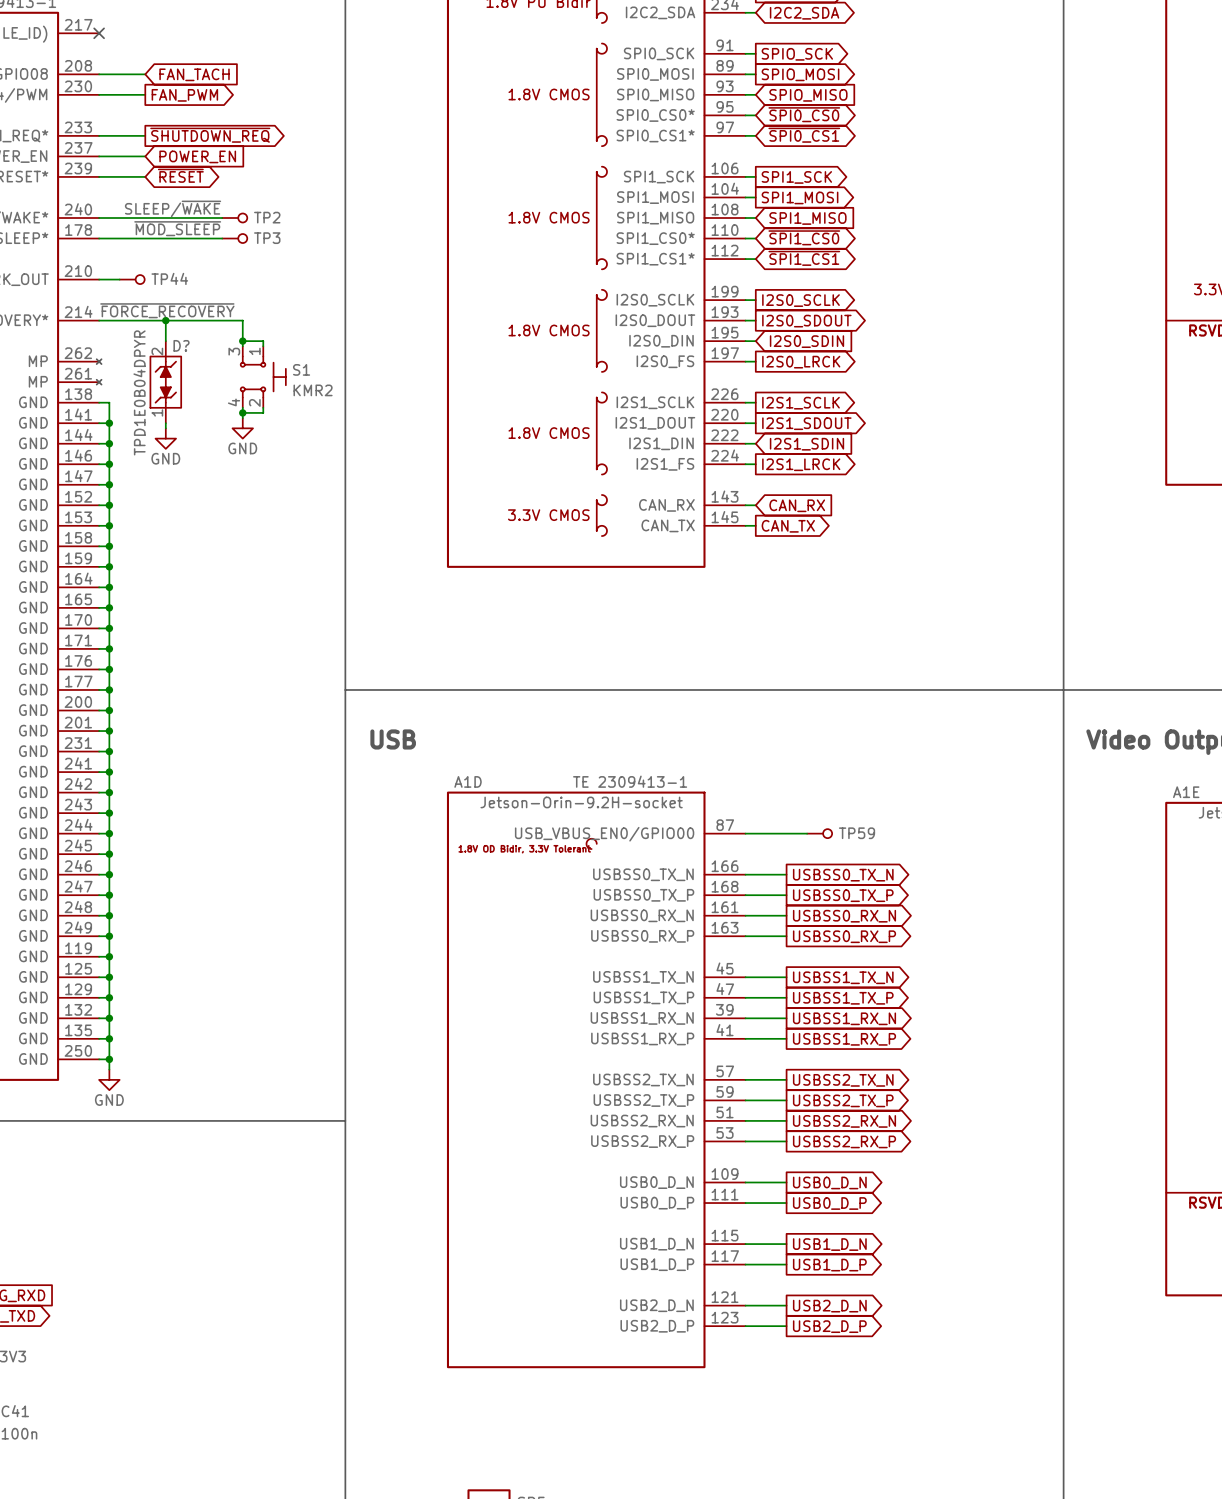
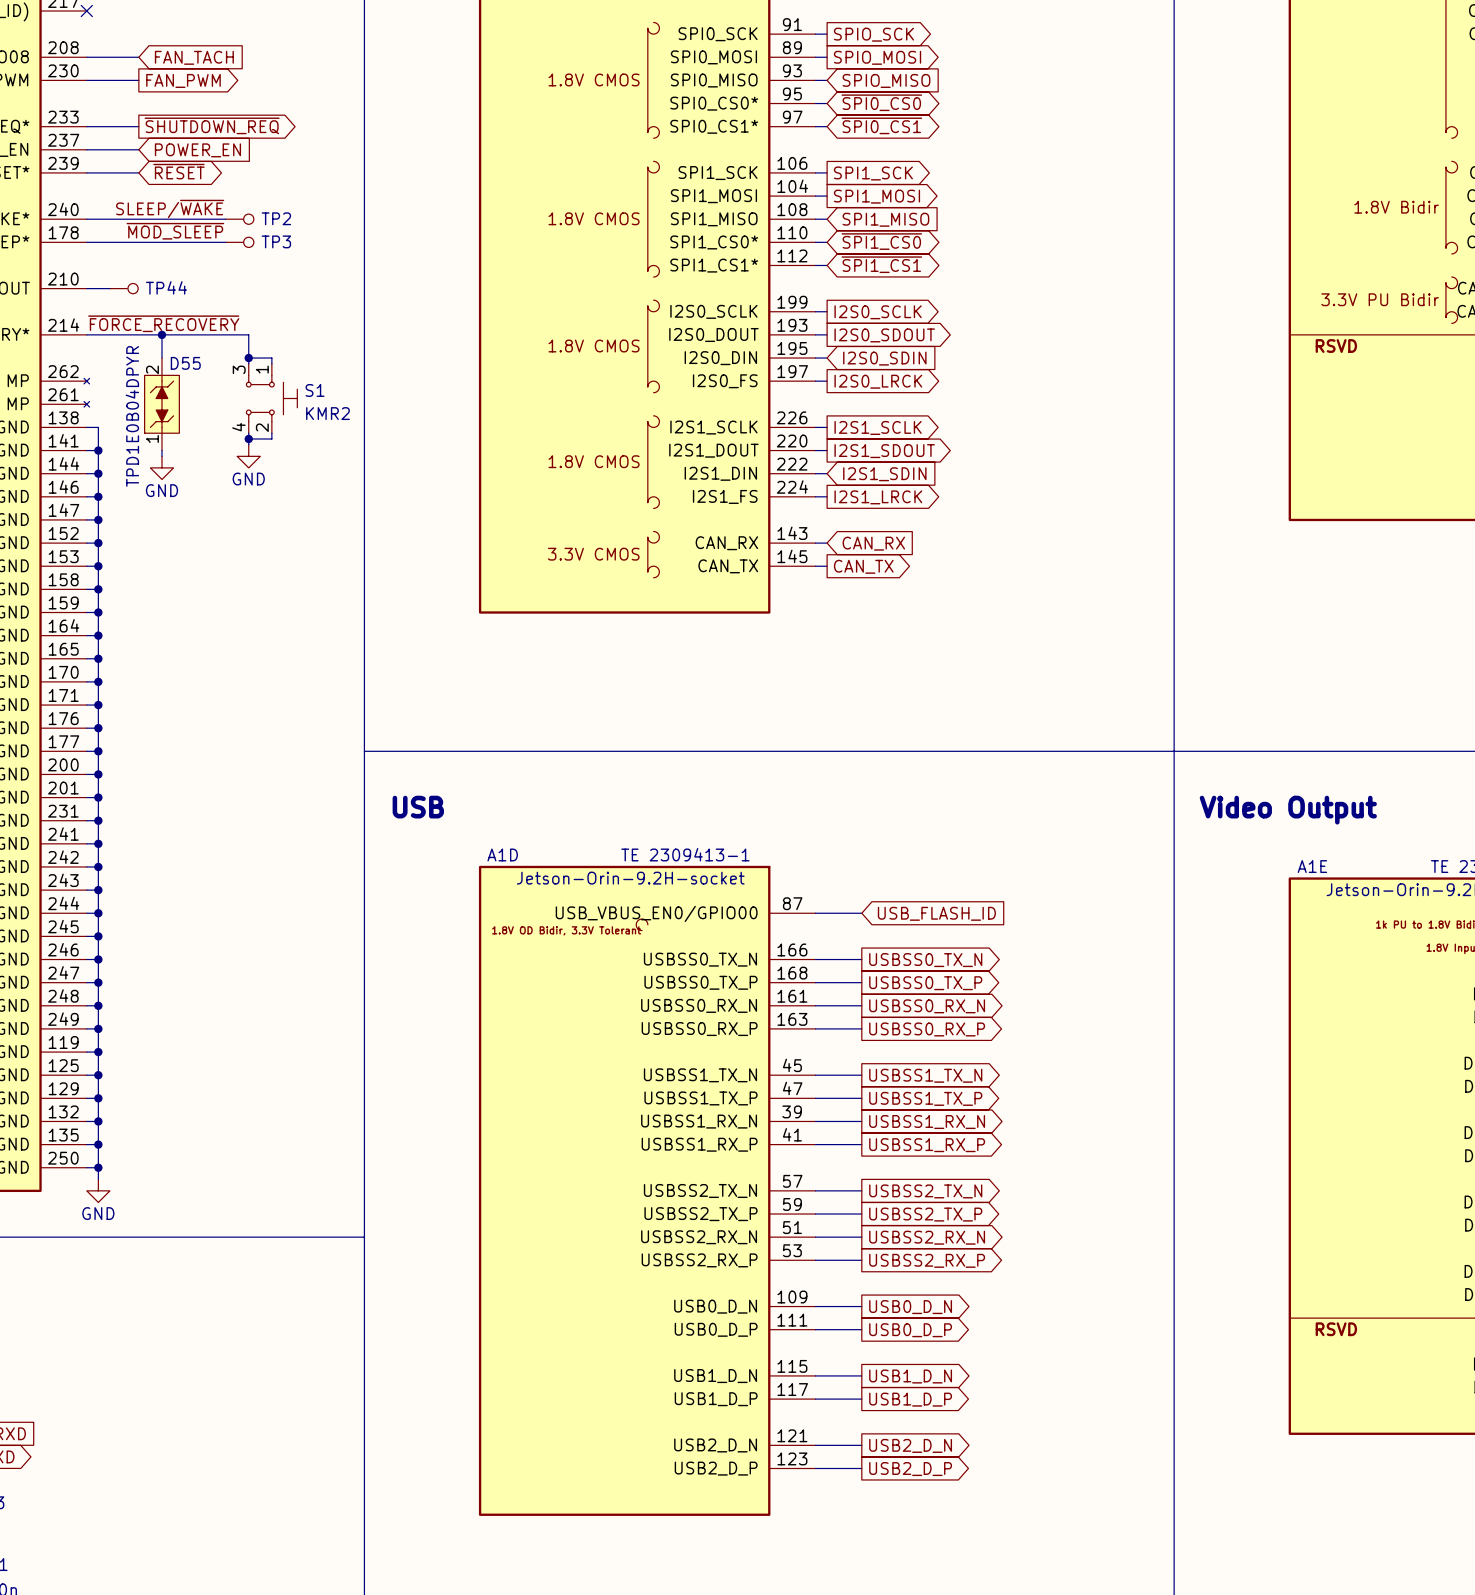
D? name: D? (181, 345) -> D55 (185, 363)
wire: (786, 833) (807, 833) -> none
TP59: (819, 833) -> none
global label: none -> USB_FLASH_ID (936, 913)

